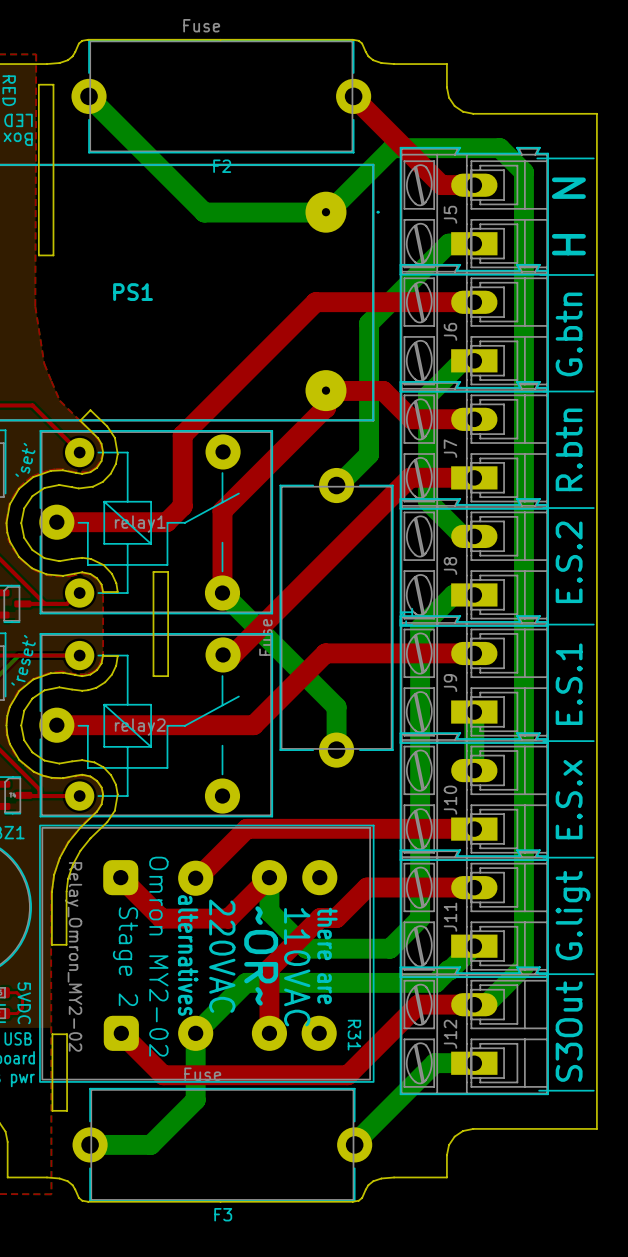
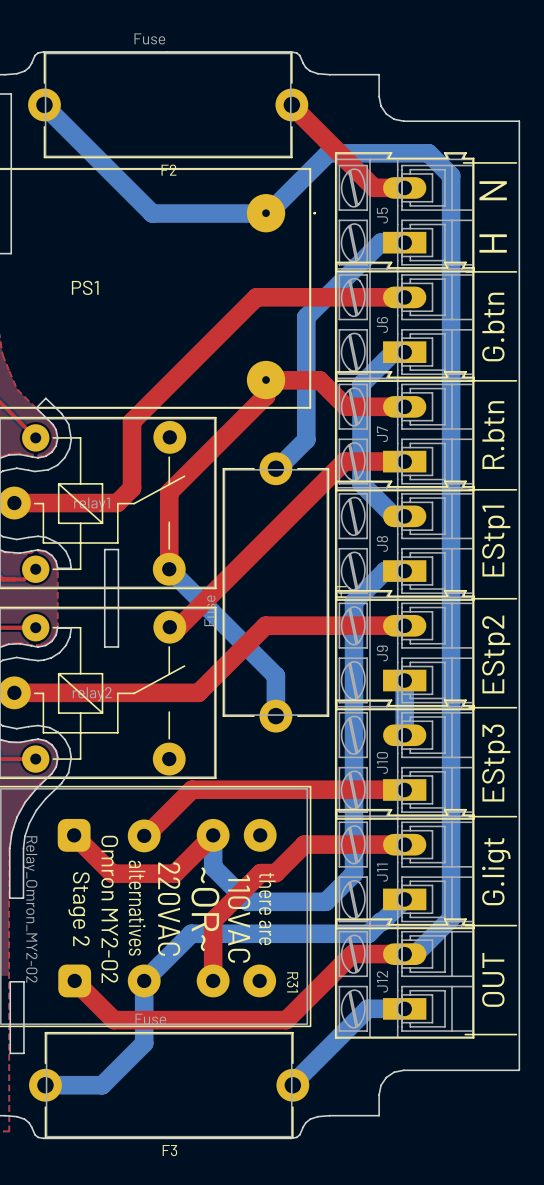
text: E.S.2 (569, 562) -> EStp1 (496, 541)
text: E.S.1 (569, 684) -> EStp2 (496, 654)
text: E.S.x (569, 799) -> EStp3 (496, 763)
text: S3Out (569, 1031) -> OUT (493, 979)

